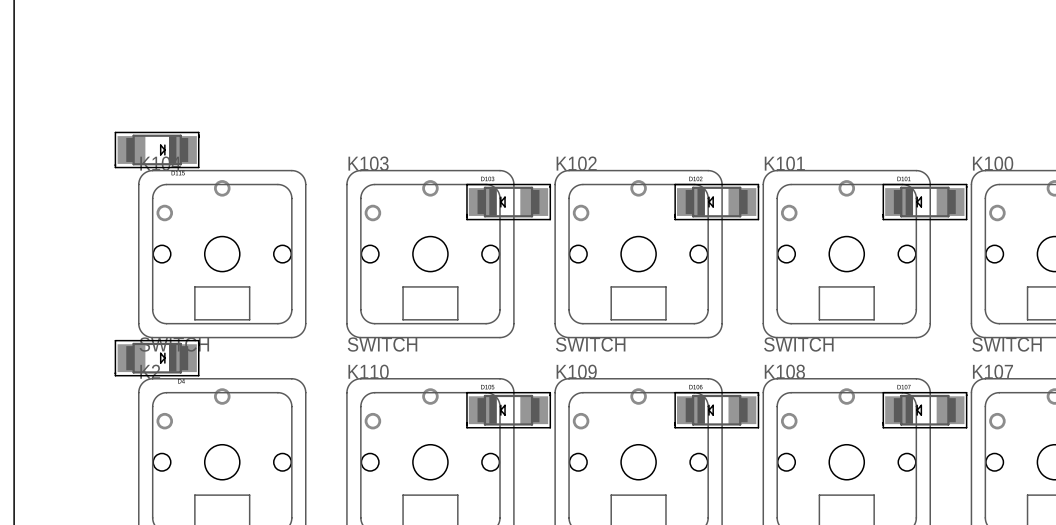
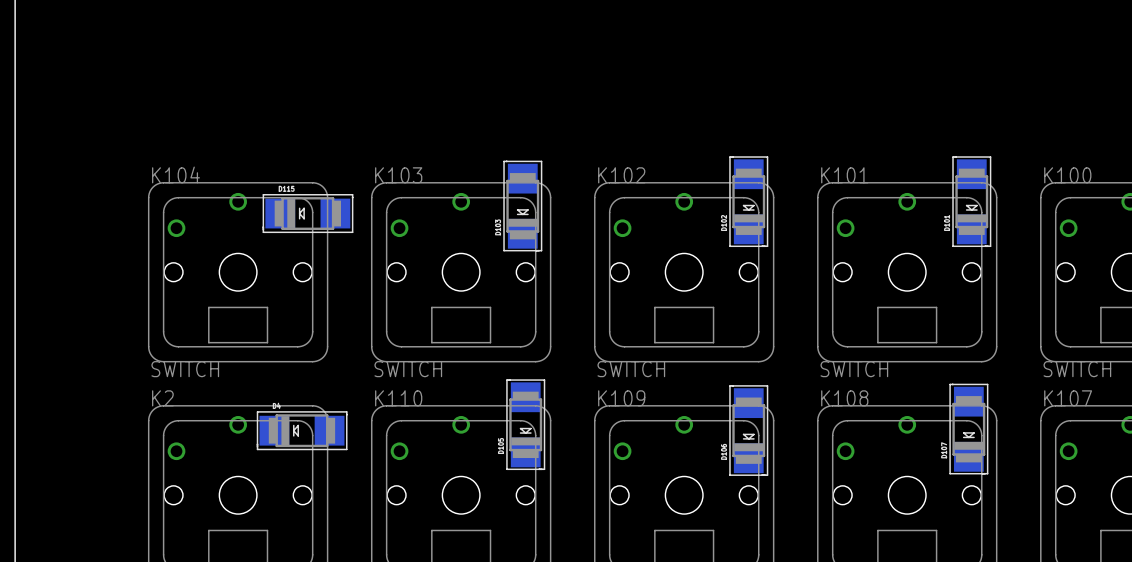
part rotation: 0° (157, 150) -> 180° (308, 213)
part position: (157, 150) -> (308, 213)
part rotation: 0° (508, 202) -> 90° counterclockwise (522, 206)
part rotation: 0° (716, 202) -> 90° counterclockwise (748, 201)
part rotation: 0° (924, 202) -> 90° counterclockwise (971, 201)
part rotation: 0° (157, 358) -> 180° (302, 430)
part position: (157, 358) -> (302, 430)
part rotation: 0° (508, 410) -> 90° counterclockwise (525, 424)
part rotation: 0° (716, 410) -> 90° counterclockwise (748, 430)
part rotation: 0° (924, 410) -> 90° counterclockwise (968, 429)

